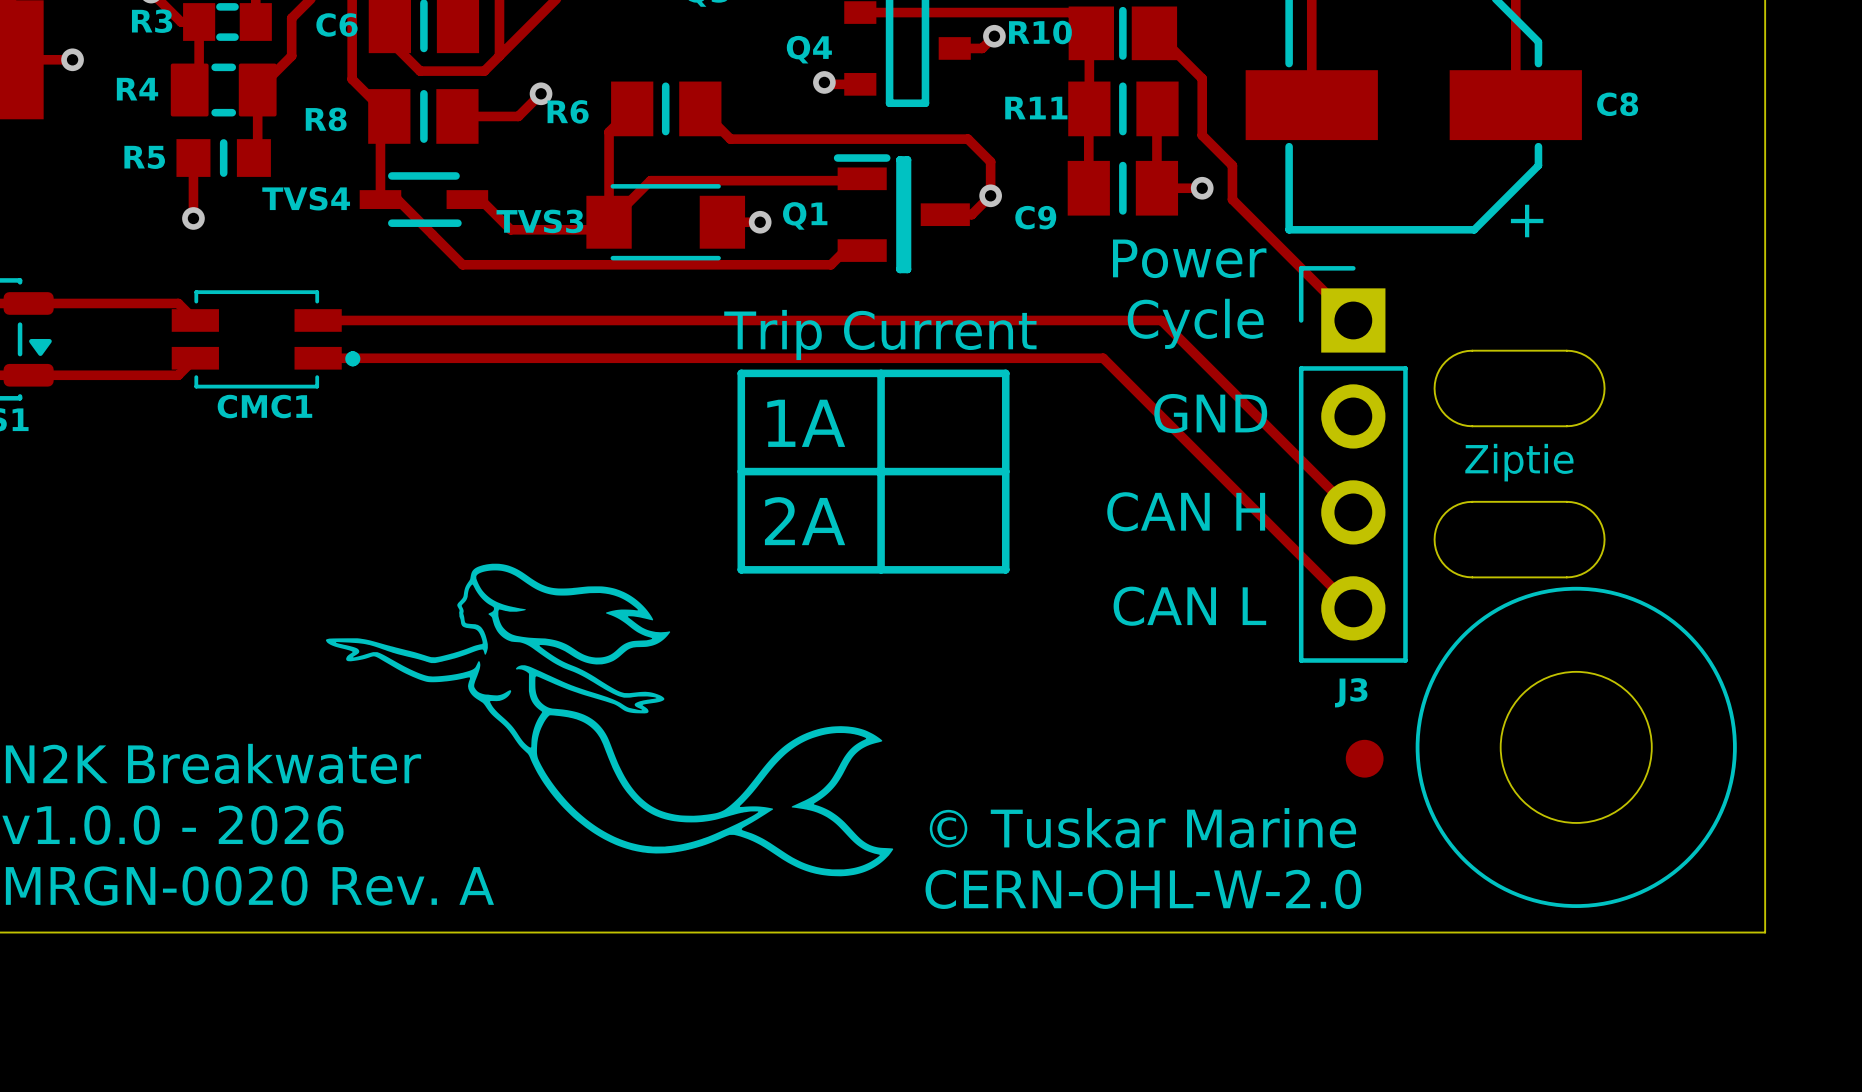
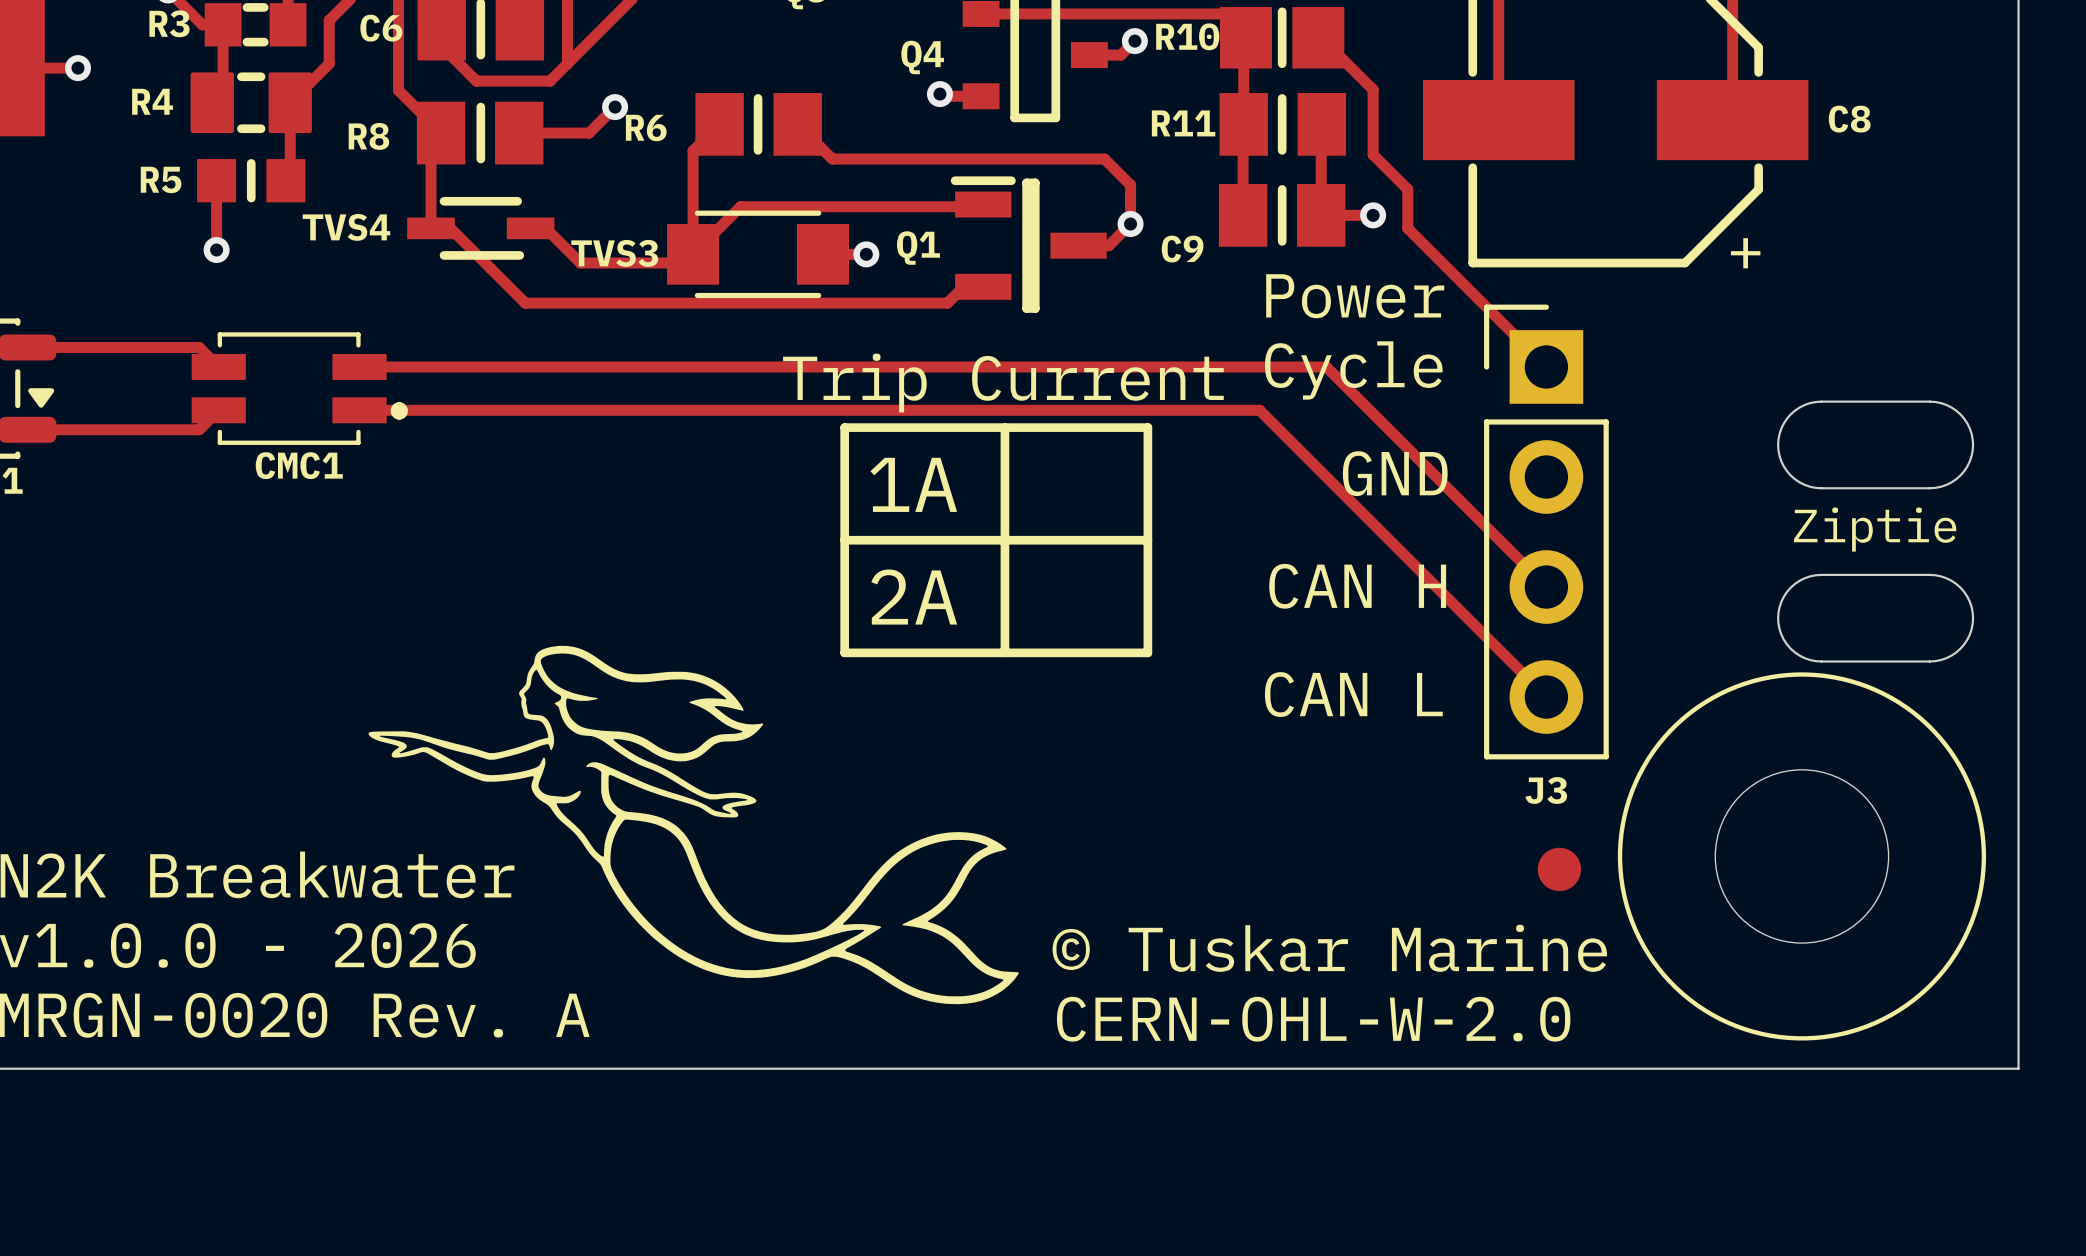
drawing: [1433, 349, 1606, 428] -> none
drawing: none -> [1777, 400, 1975, 490]
text position: Ziptie (1519, 462) -> Ziptie (1875, 529)
drawing: [1433, 500, 1606, 579] -> none
drawing: none -> [1777, 573, 1975, 663]

